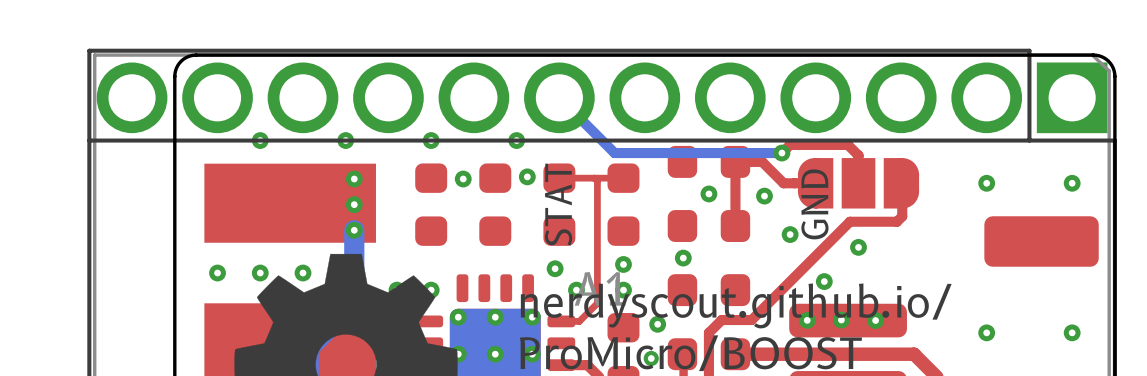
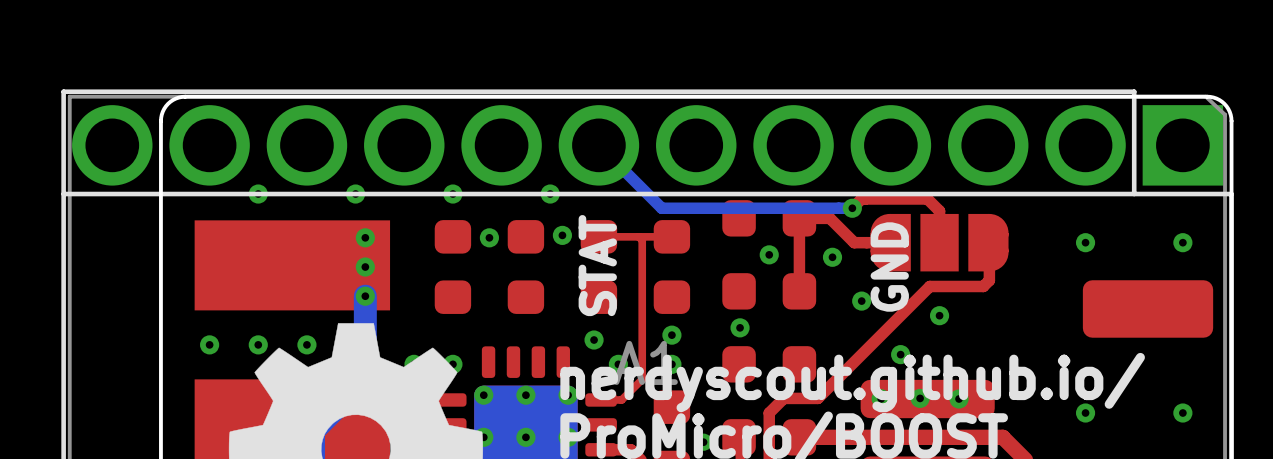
via: (657, 324) -> none

